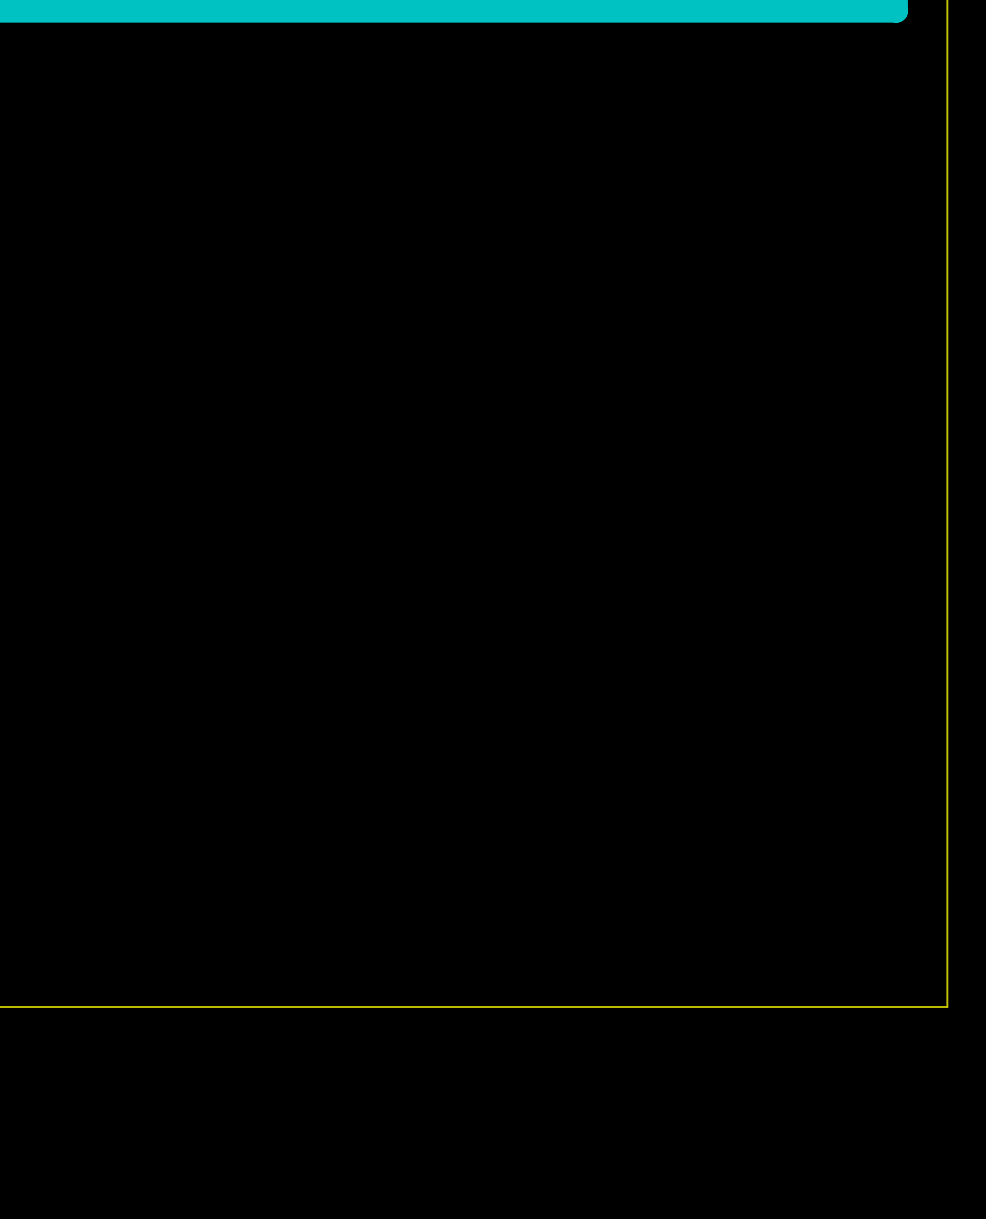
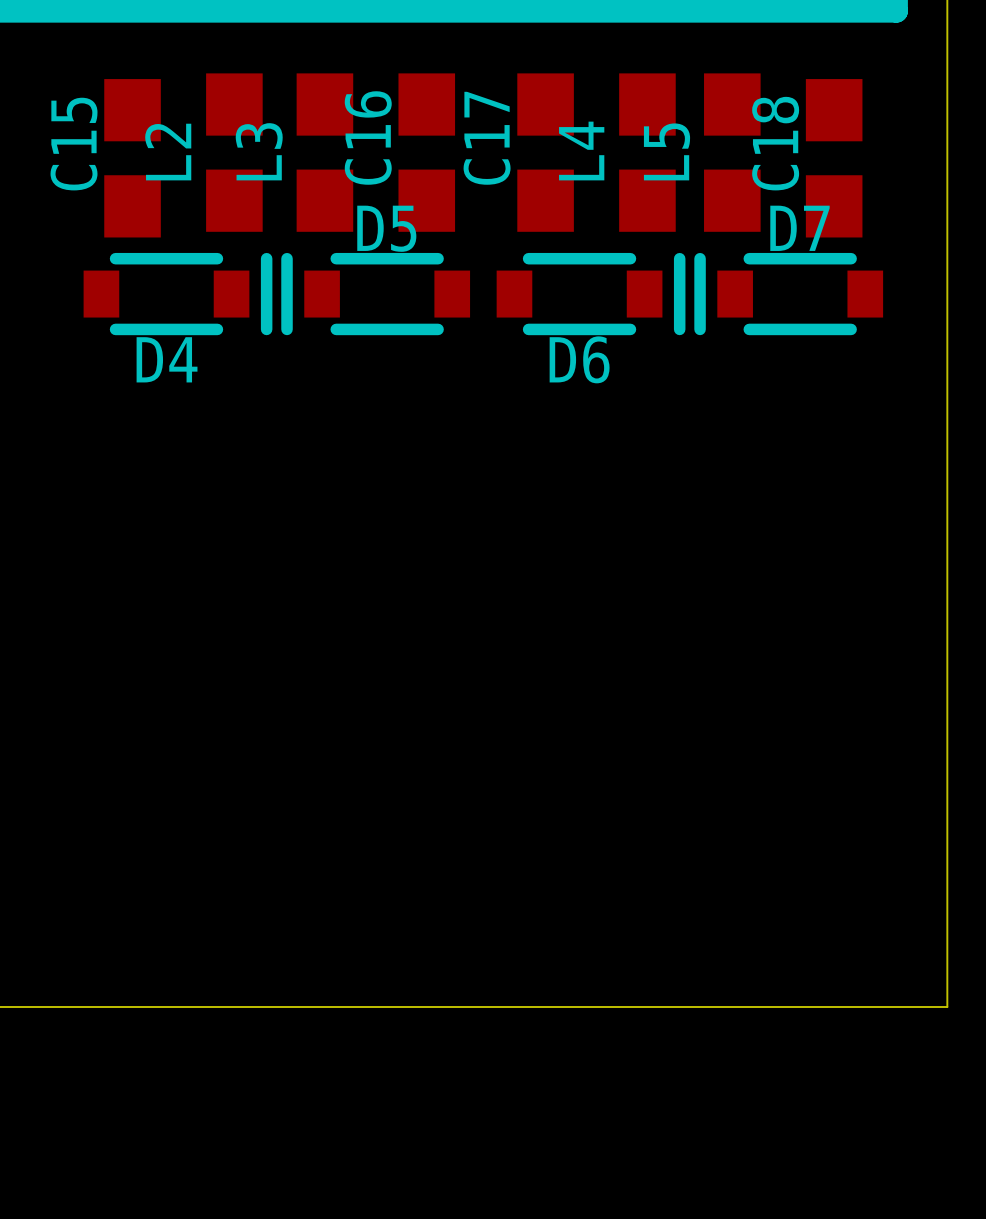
L2: none -> (234, 152)
L3: none -> (324, 152)
C16: none -> (426, 152)
C17: none -> (545, 152)
L4: none -> (647, 152)
L5: none -> (732, 152)
C15: none -> (132, 158)
C18: none -> (834, 158)
D4: none -> (177, 294)
D5: none -> (375, 294)
D6: none -> (591, 294)
D7: none -> (788, 294)

